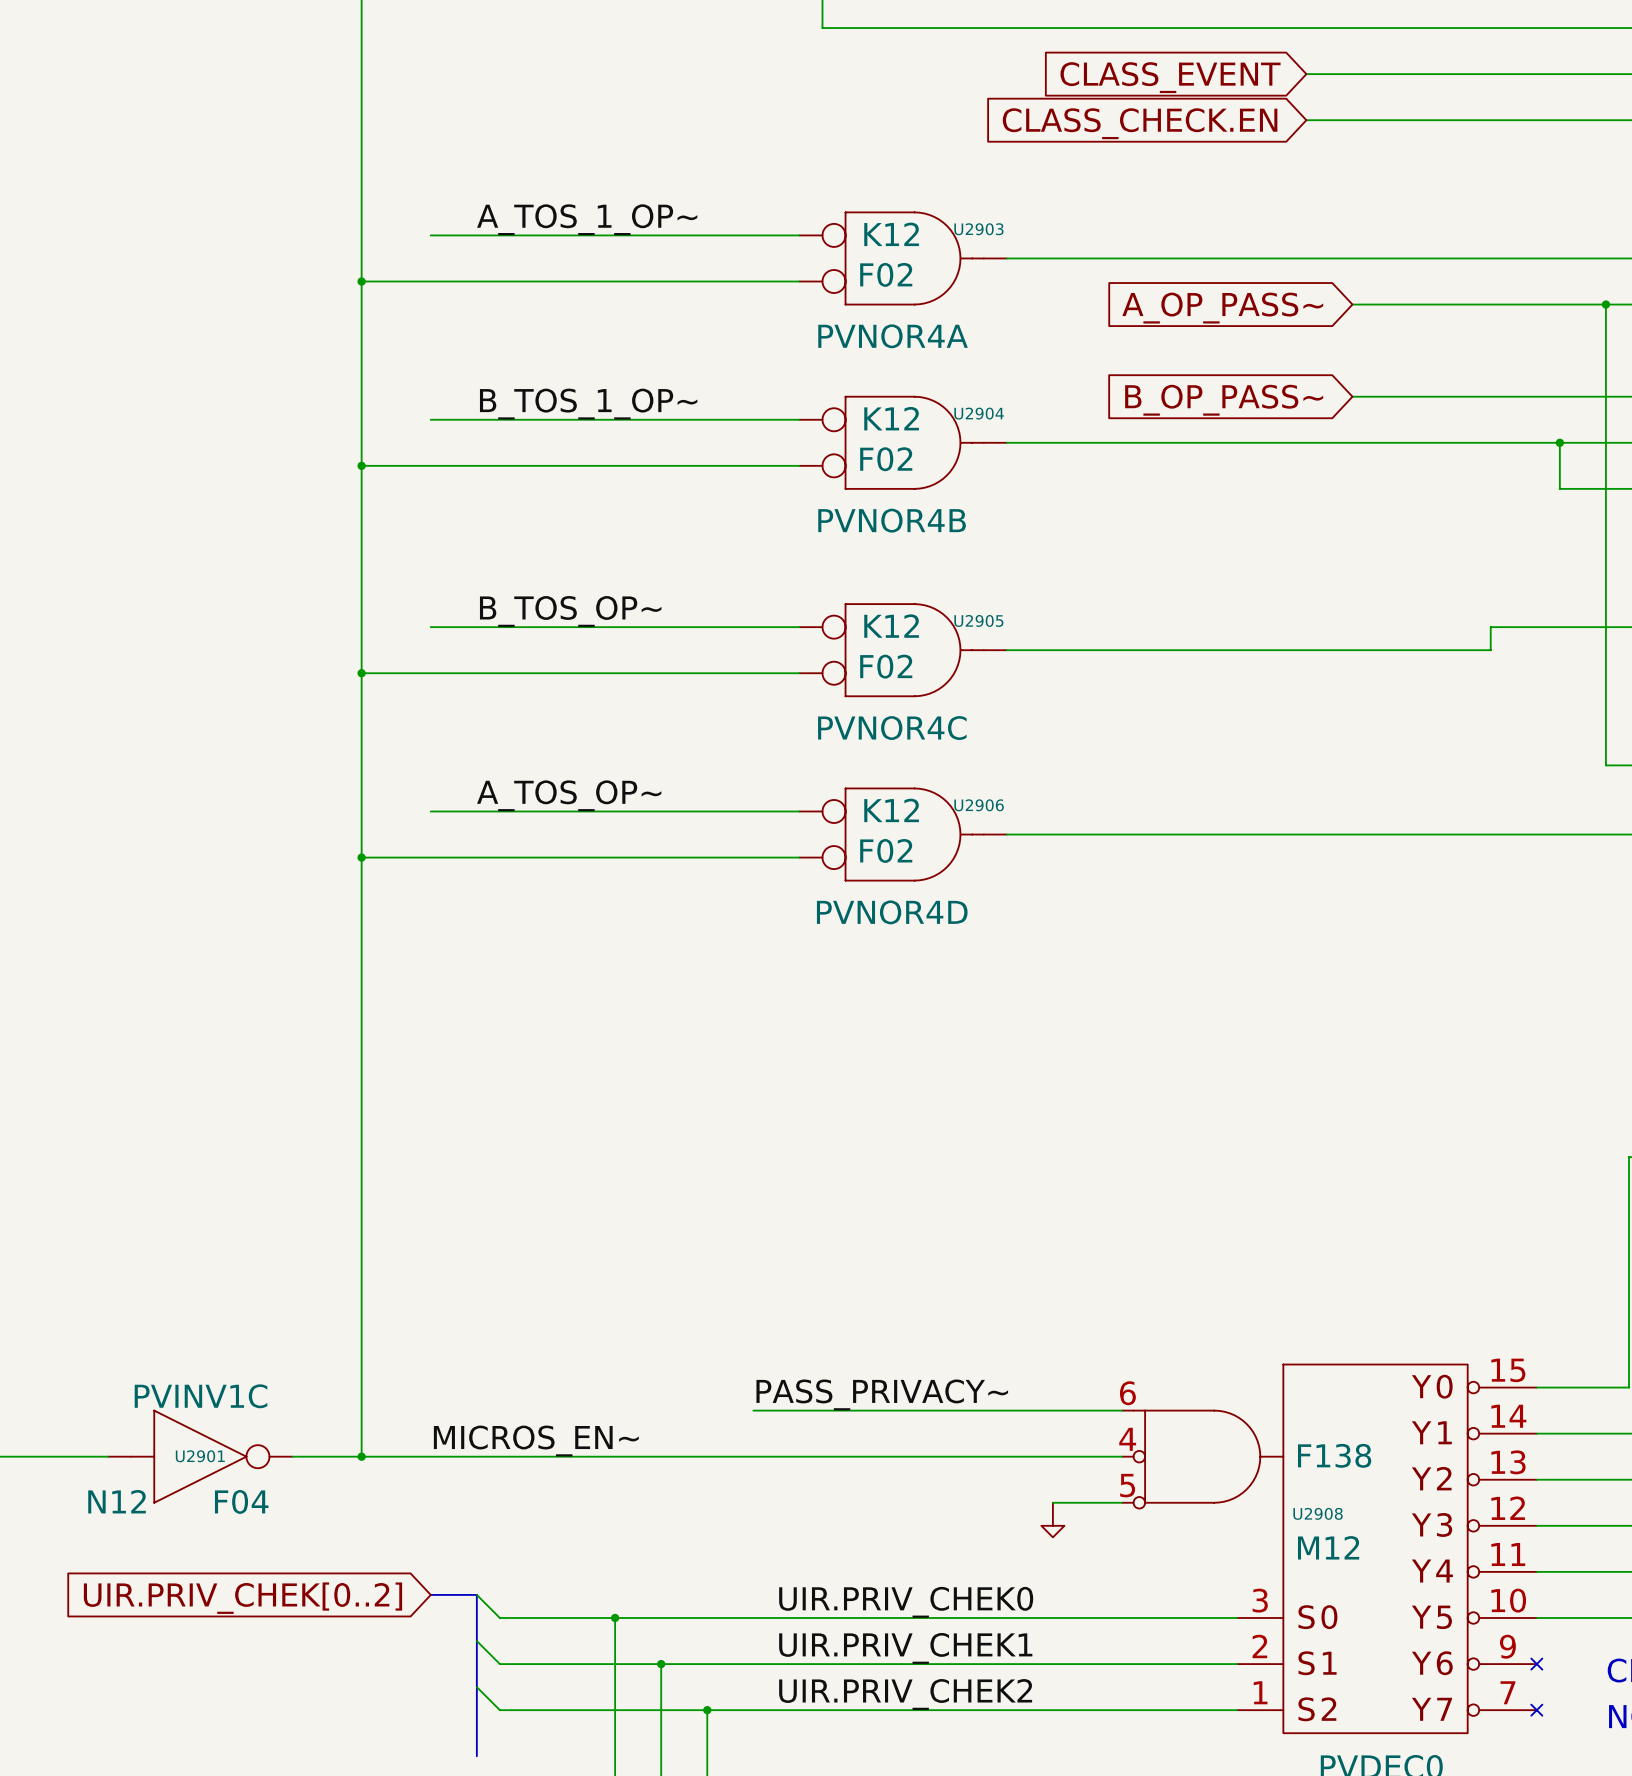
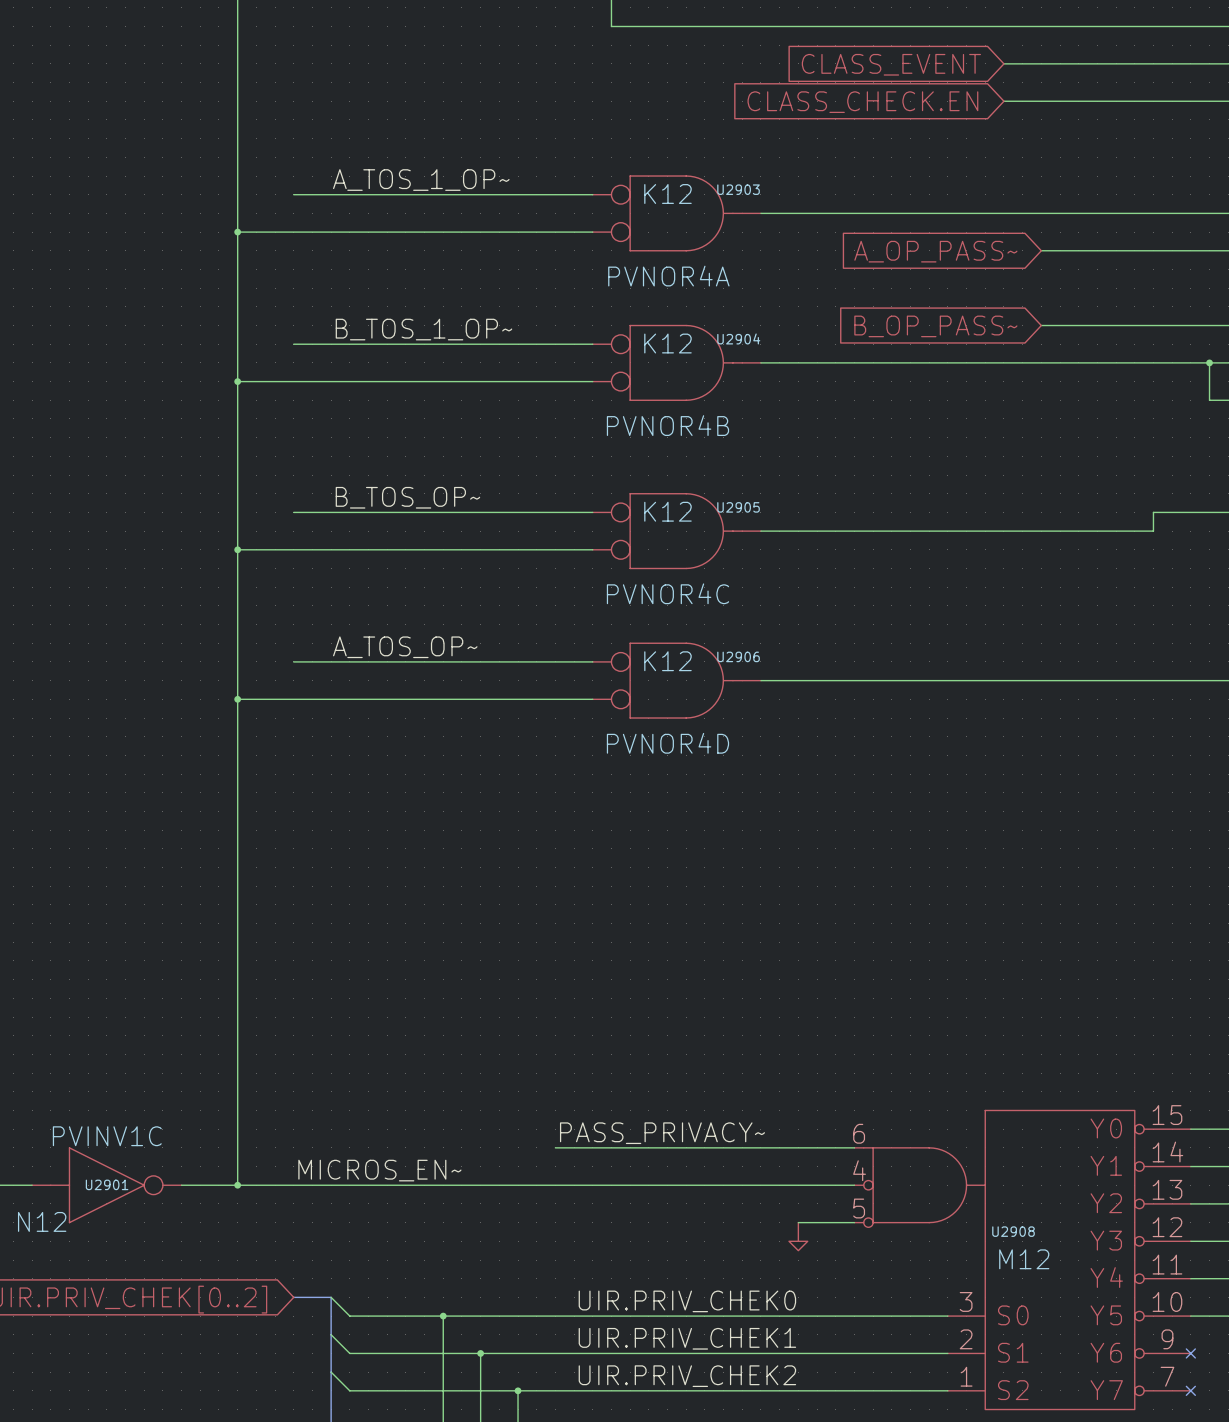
U2903 value: F02 (886, 274) -> none
U2904 value: F02 (886, 459) -> none
U2905 value: F02 (886, 666) -> none
U2906 value: F02 (886, 850) -> none
U2908 value: F138 (1334, 1455) -> none
U2901 value: F04 (241, 1501) -> none

